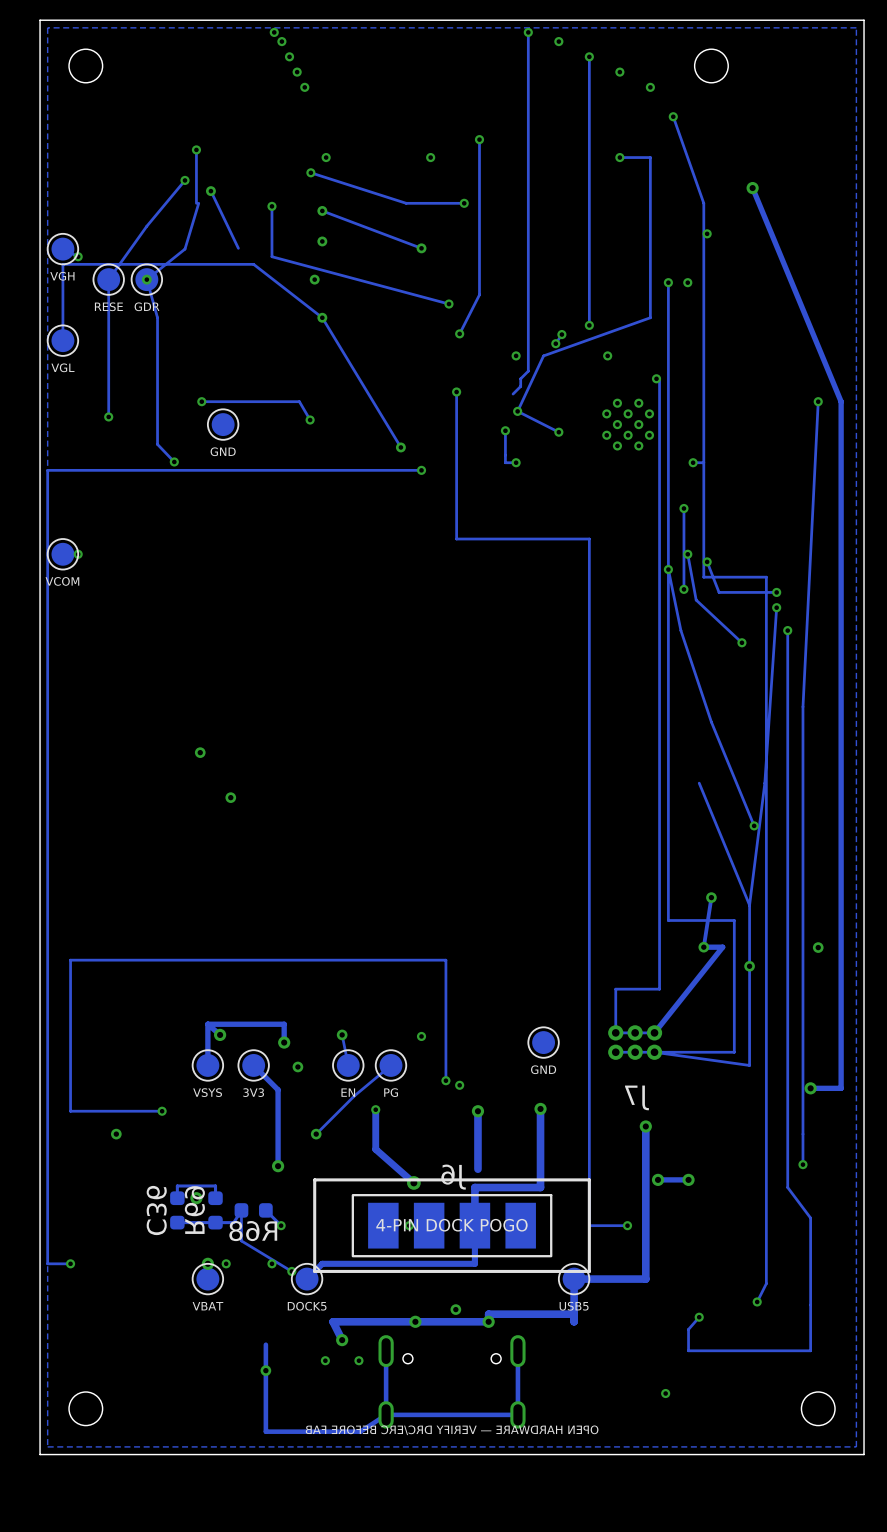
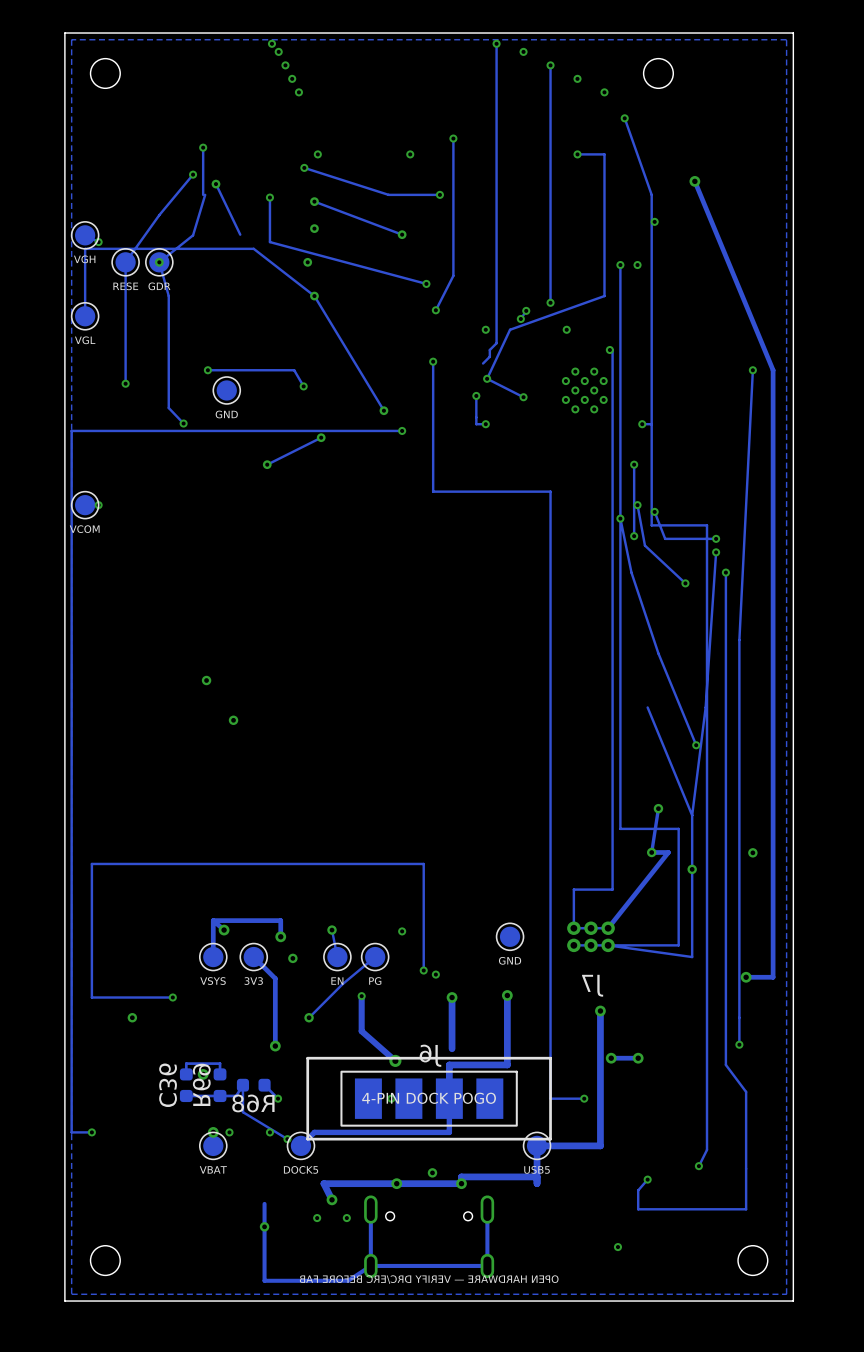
track: none -> (321, 437) (267, 464)
via: none -> (321, 437)
via: none -> (267, 464)

